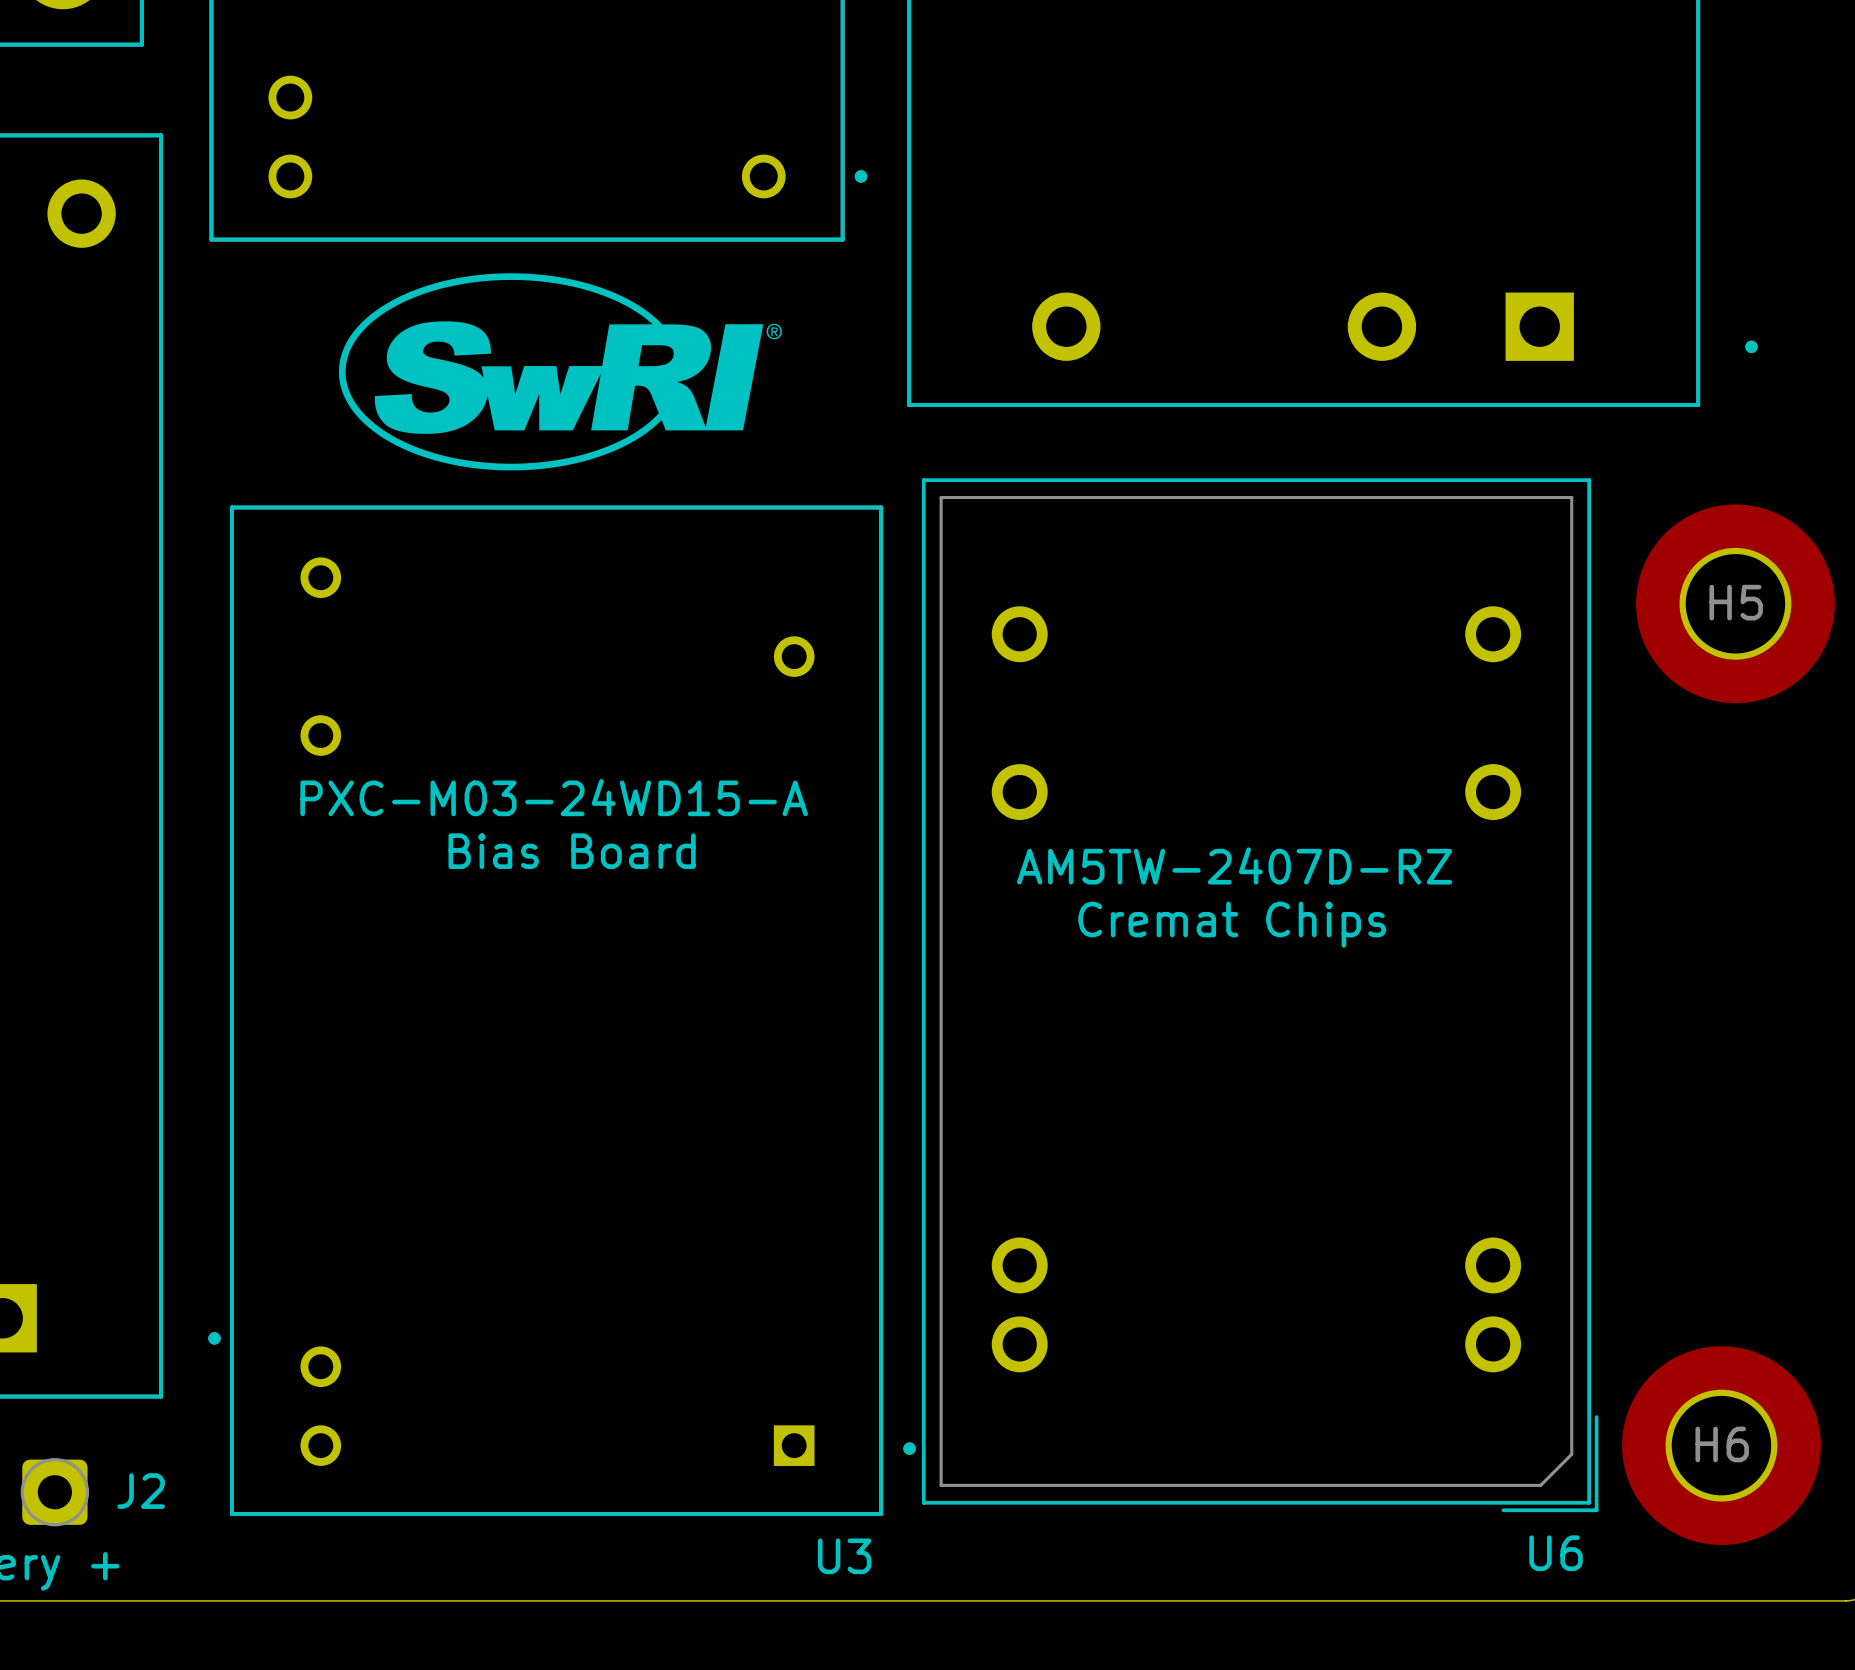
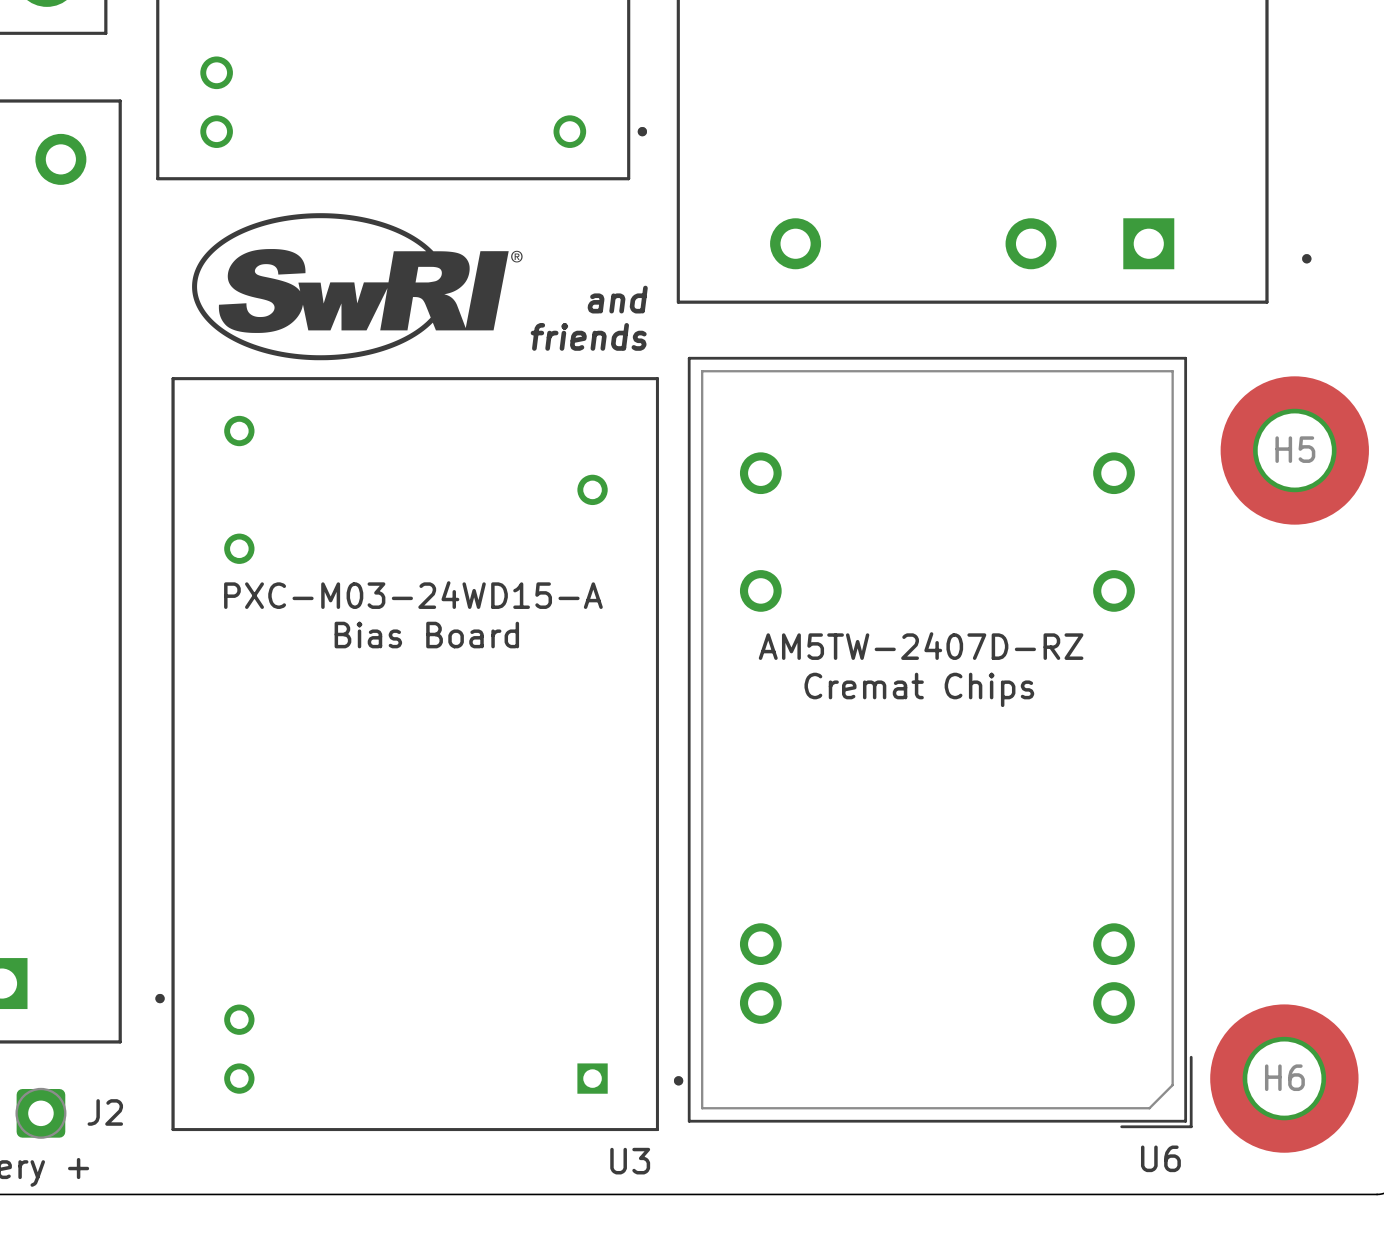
drawing position: (560, 371) -> (357, 286)
text: none -> and (617, 299)
text: none -> friends (588, 336)

